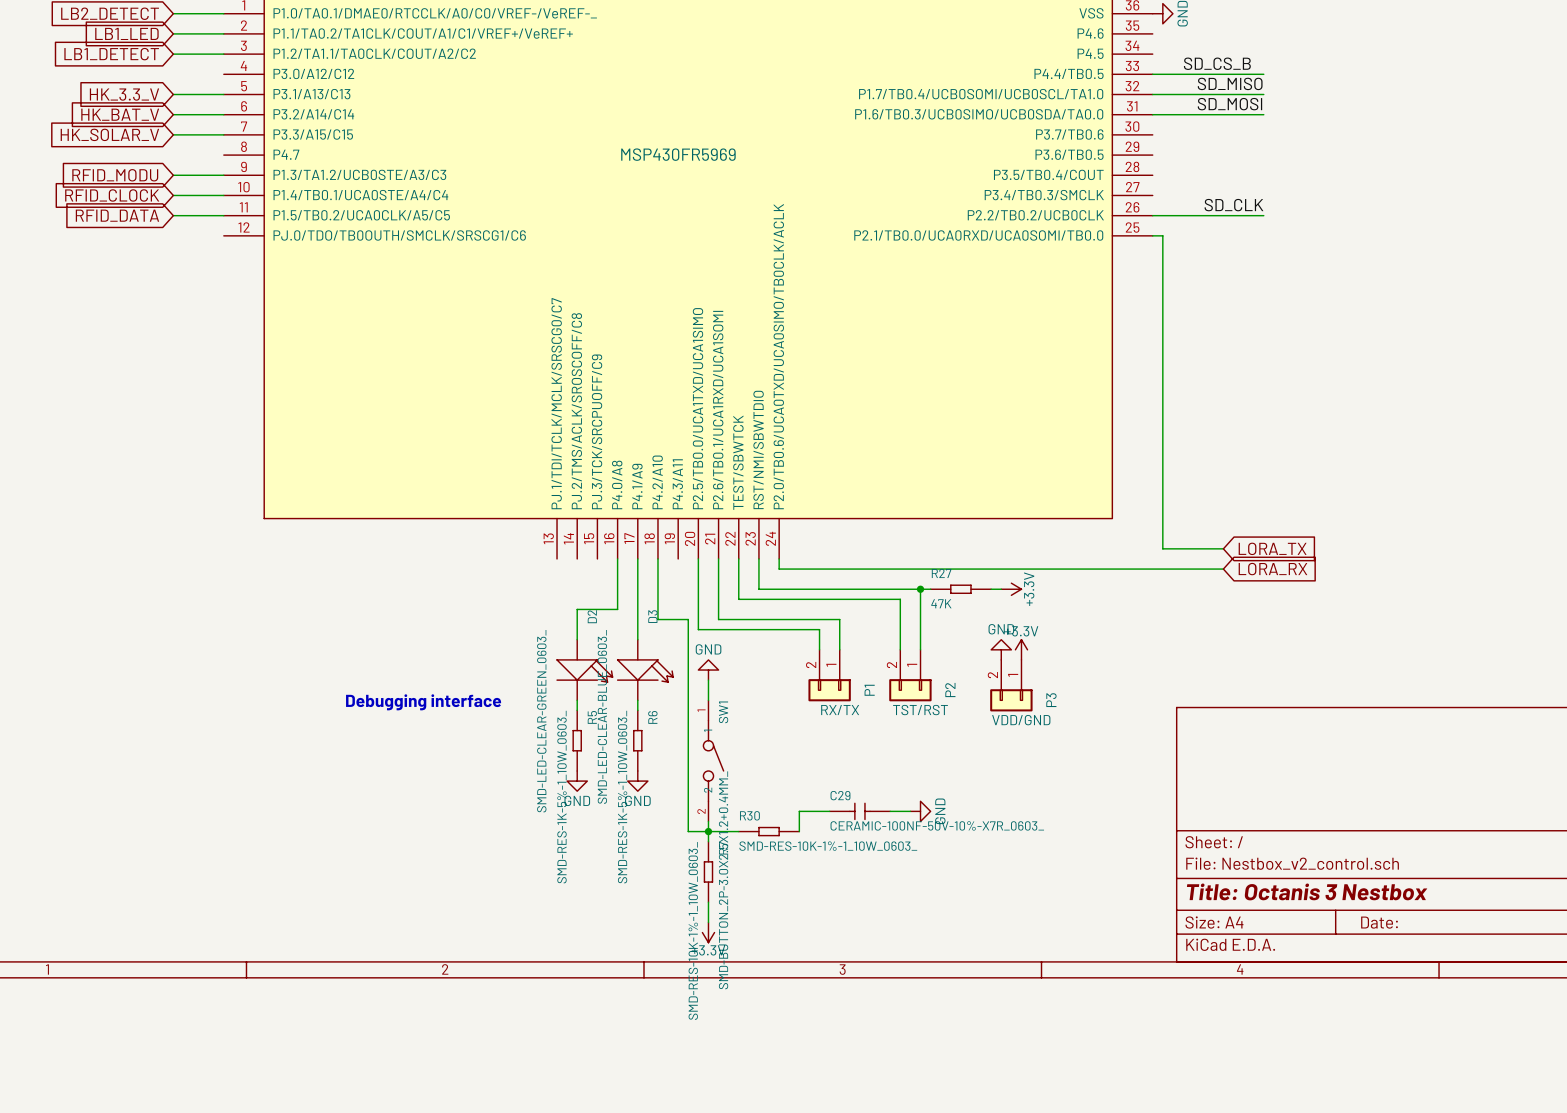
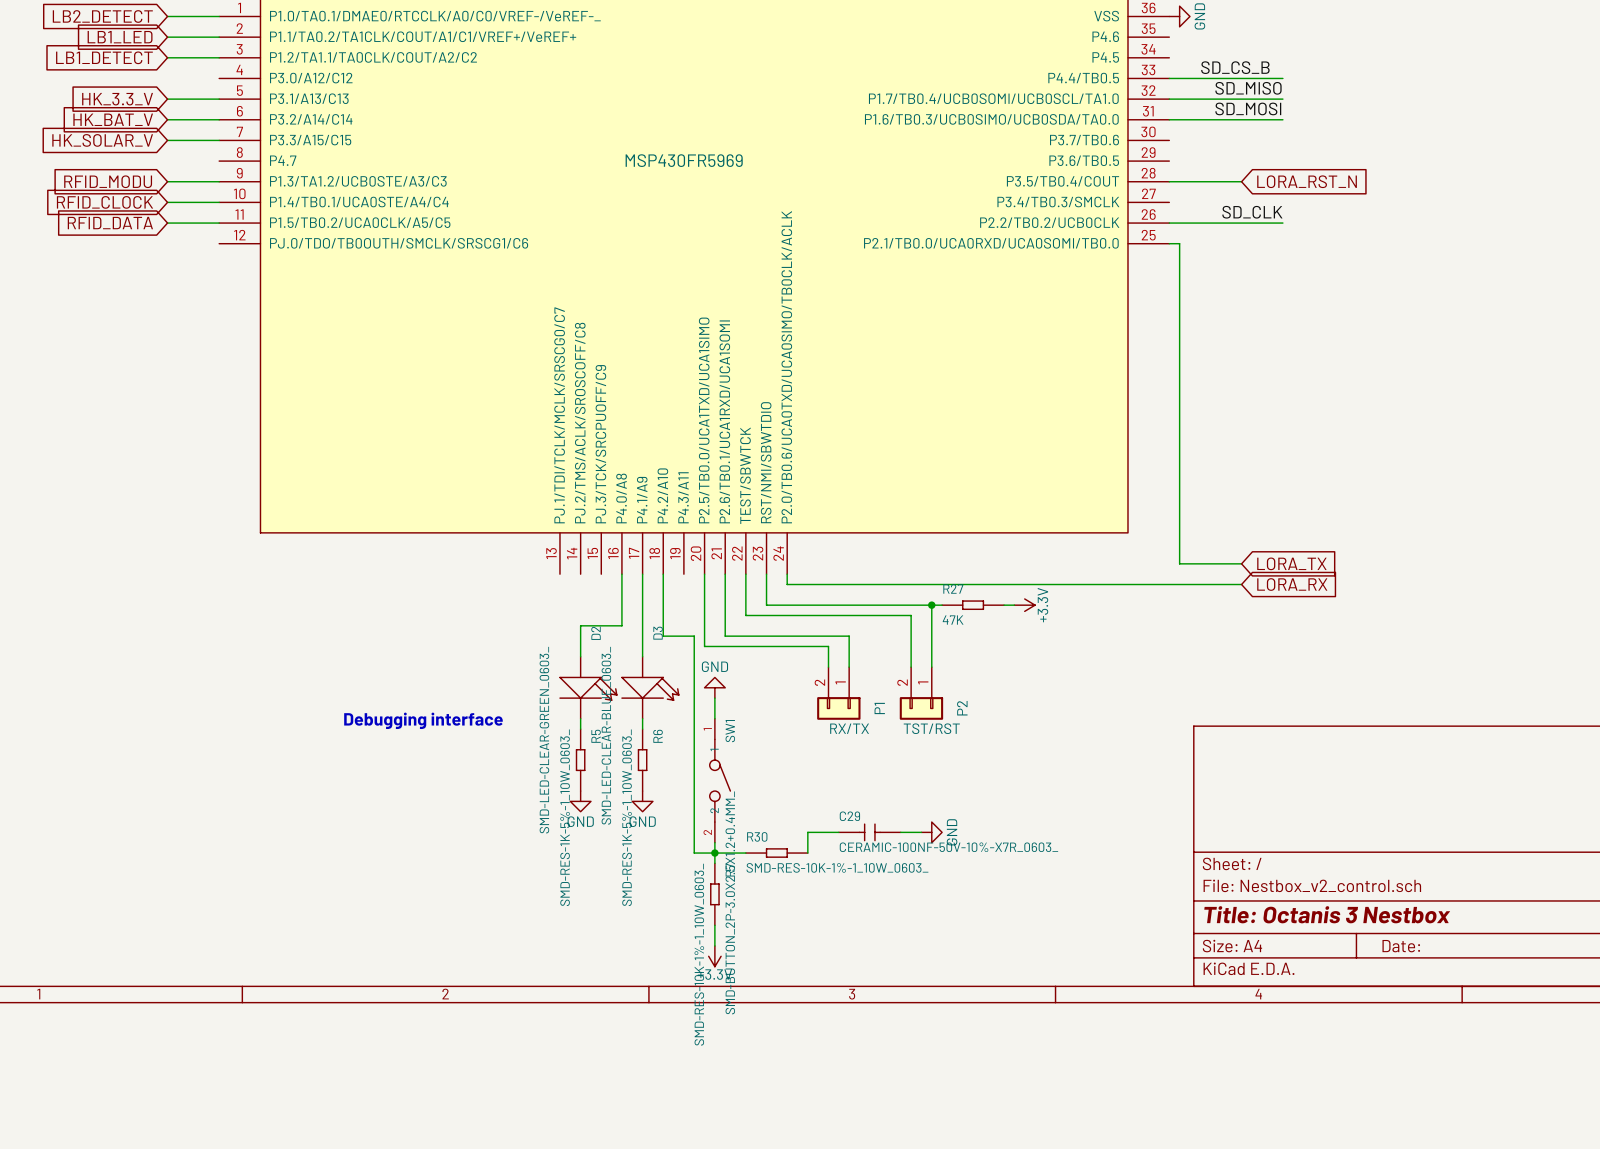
wire: none -> (1169, 181) (1241, 181)
global label: none -> LORA_RST_N (1307, 181)
power symbol: GND (1001, 649) -> none
power symbol: +3.3V (1021, 649) -> none
P3: VDD/GND (1011, 685) -> none

